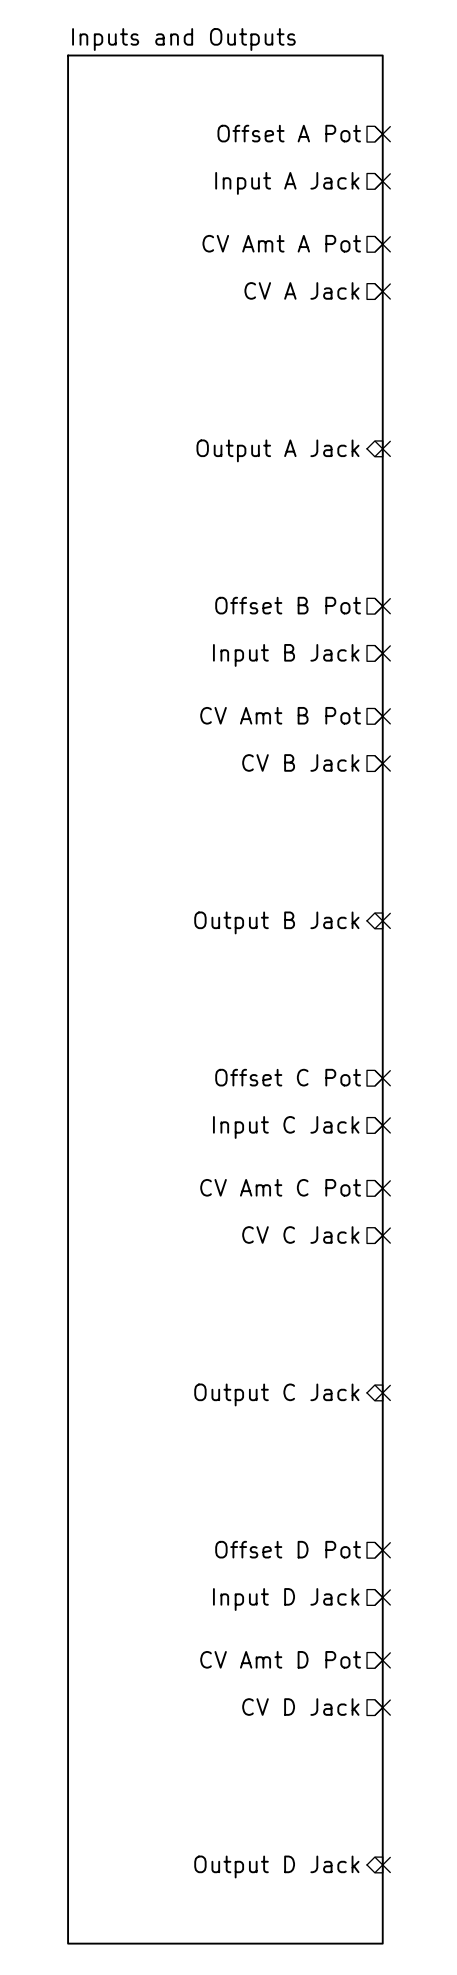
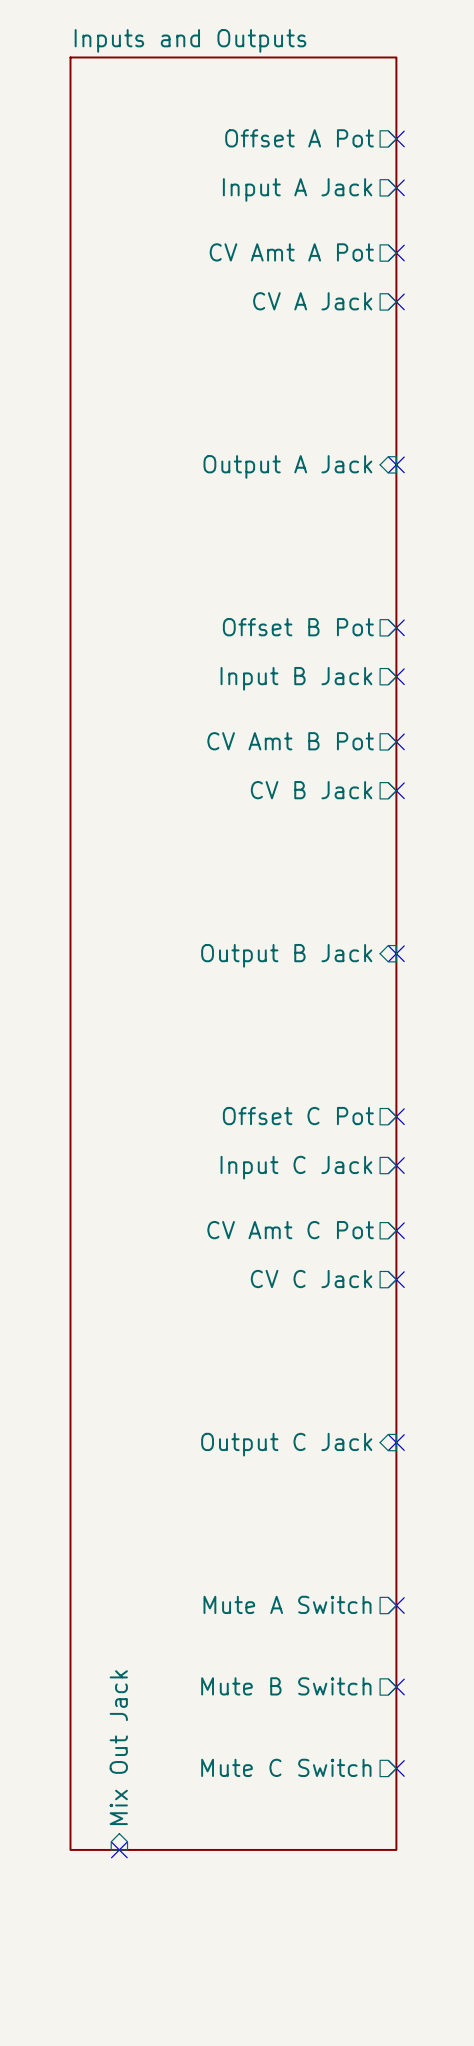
sheet Inputs and Outputs: none -> (233, 953)
sheet Inputs and Outputs: (225, 999) -> none
sheet pin: Offset D Pot (288, 1549) -> Mute A Switch (287, 1604)
no-connect mark: (382, 1597) -> none
sheet pin: Input D Jack (286, 1599) -> none
sheet pin: none -> Mute B Switch (286, 1686)
no-connect mark: none -> (396, 1686)
sheet pin: CV Amt D Pot (280, 1659) -> none
no-connect mark: (382, 1660) -> none
sheet pin: none -> Mix Out Jack (118, 1747)
sheet pin: CV D Jack (300, 1707) -> Mute C Switch (286, 1767)
no-connect mark: none -> (119, 1849)
no-connect mark: (382, 1864) -> none
sheet pin: Output D Jack (276, 1866) -> none

